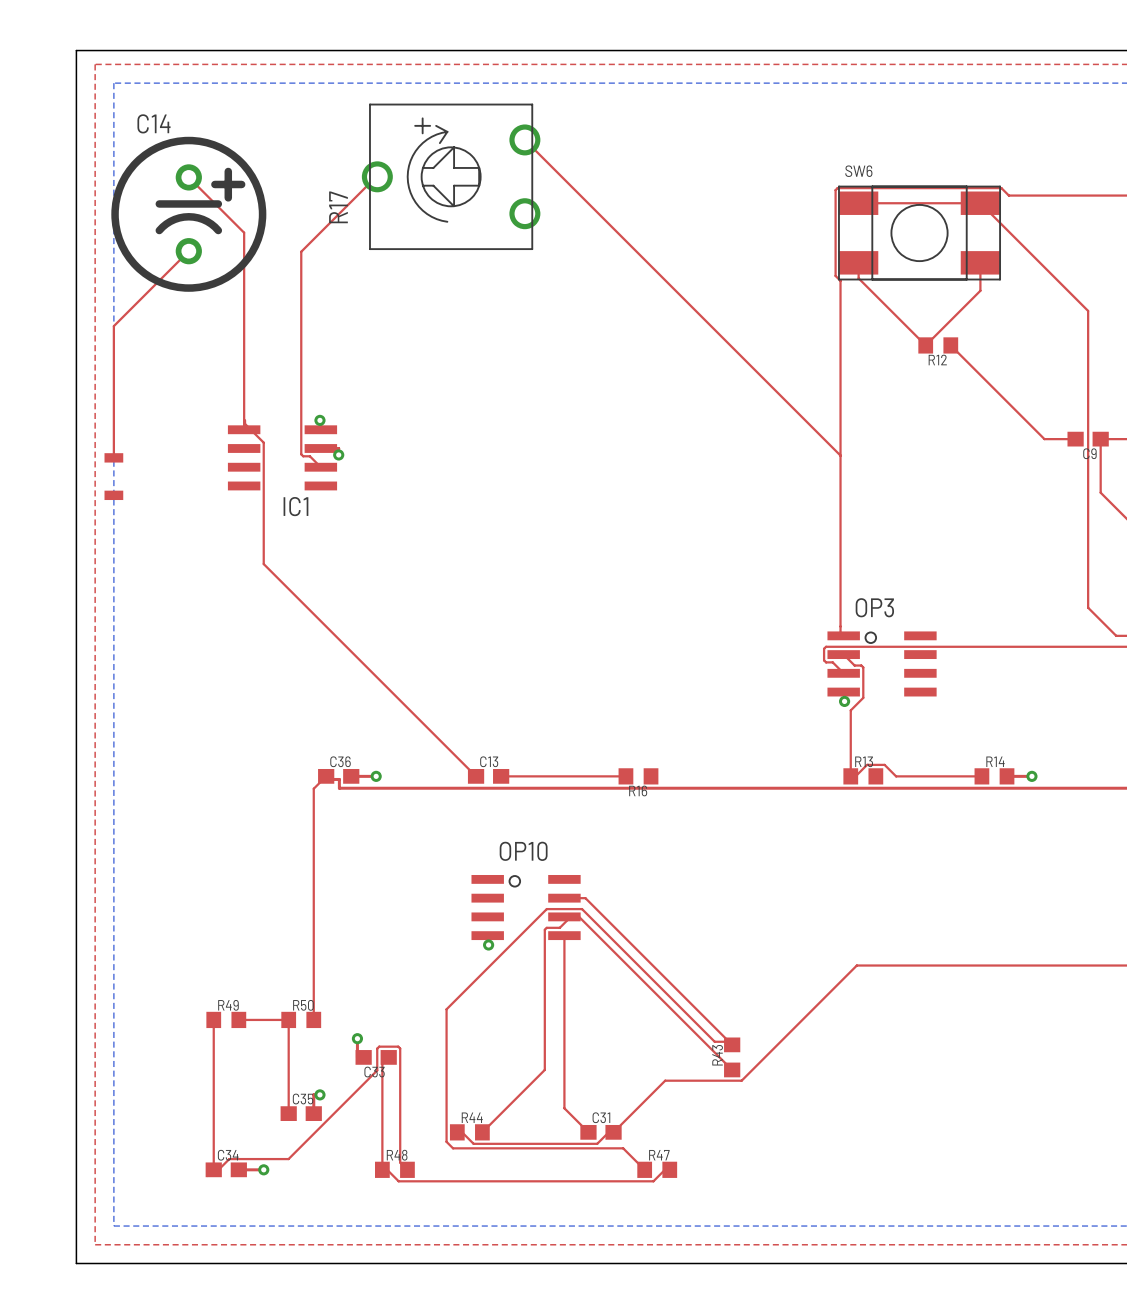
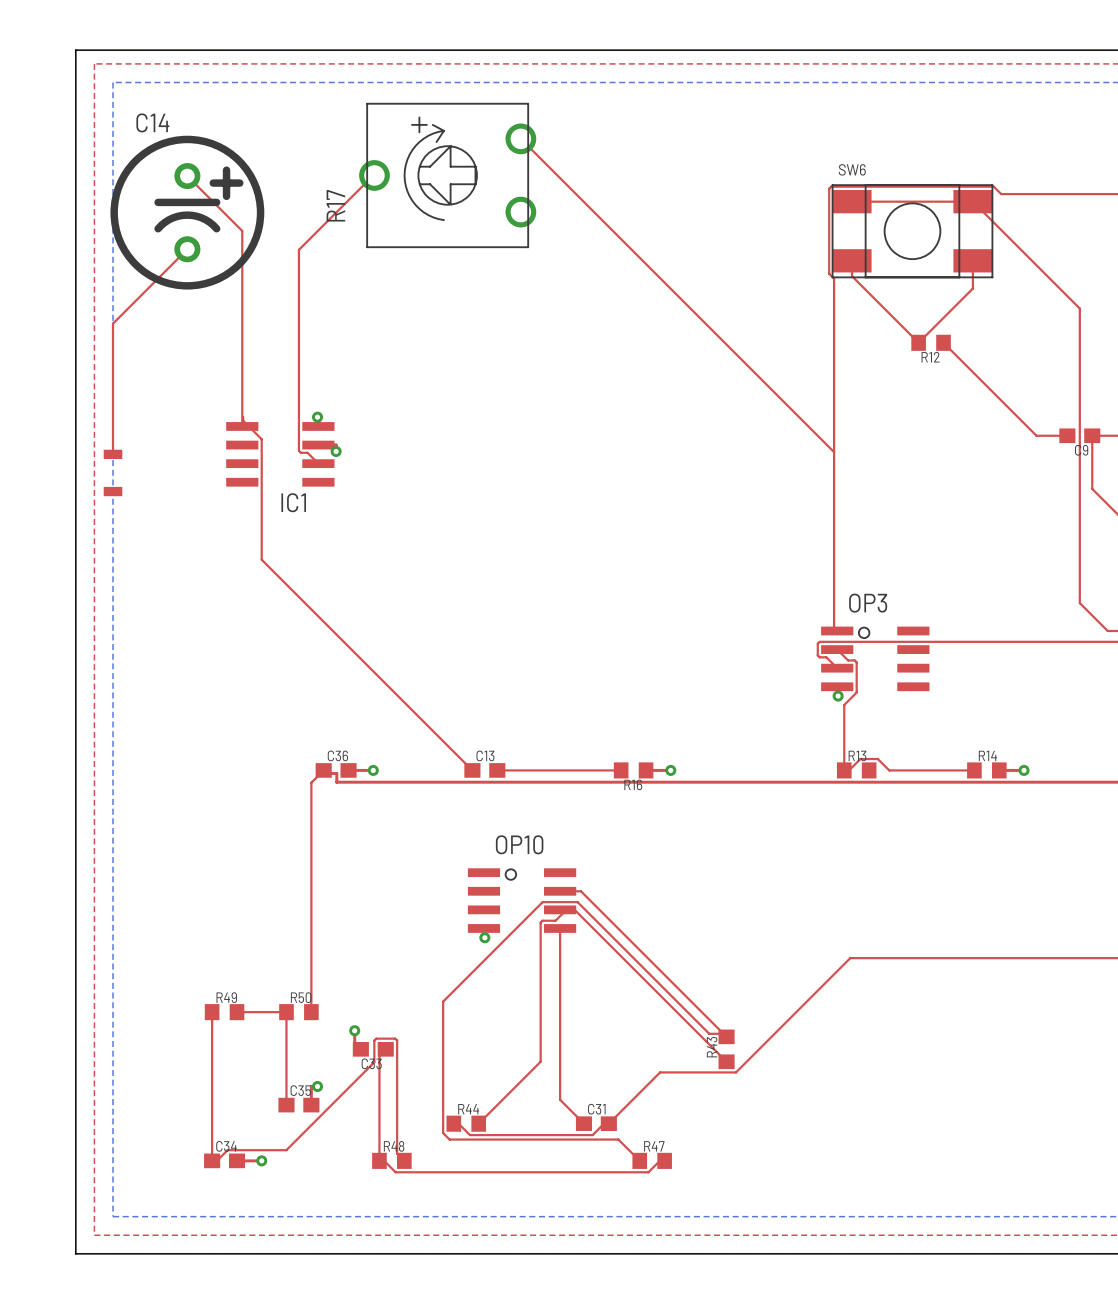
top track: none -> (646, 770) (670, 770)
via: none -> (670, 770)

